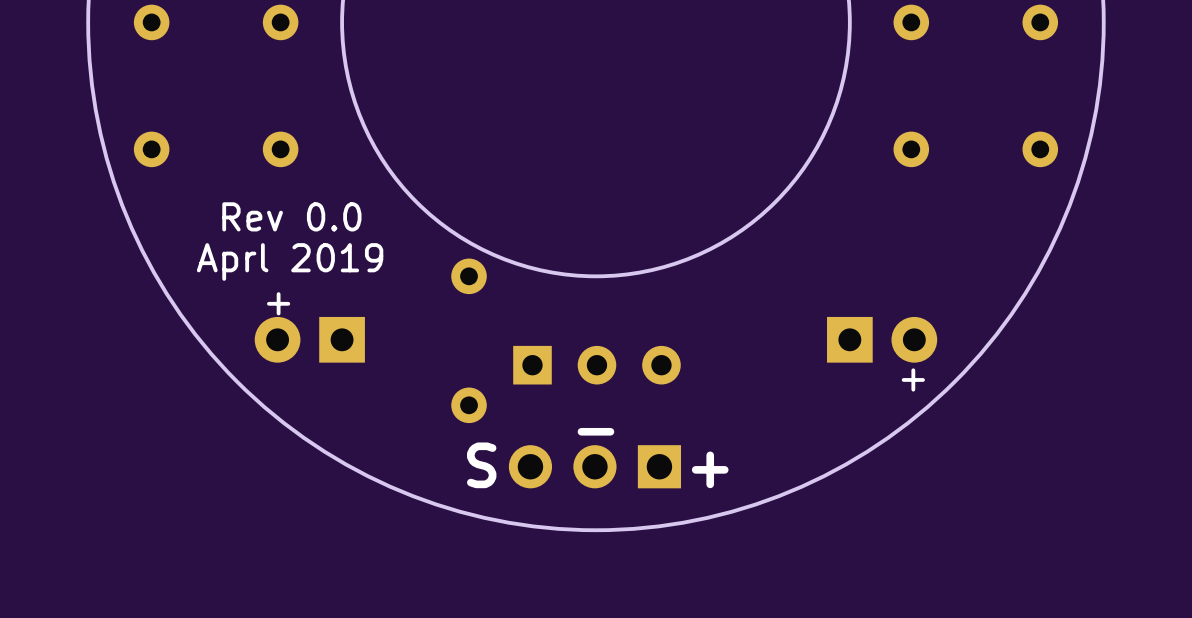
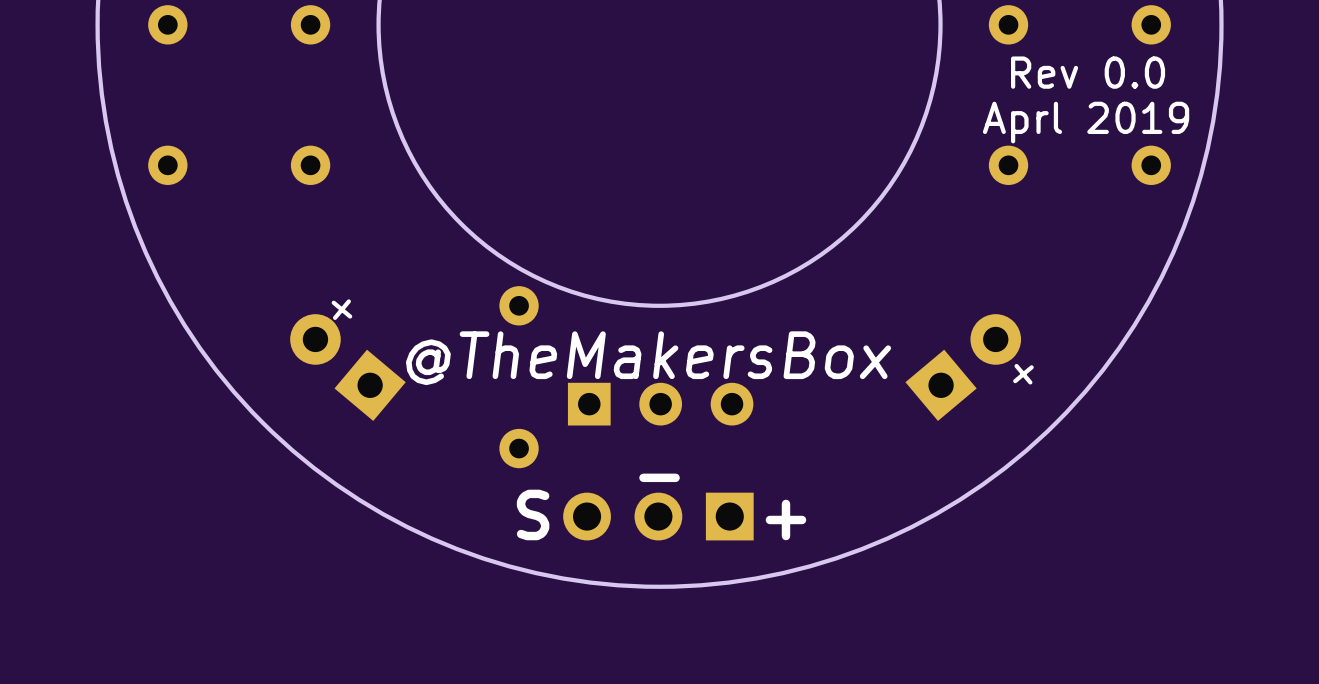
text: none -> Rev 0.0 (1088, 72)
text: none -> Aprl 2019 (1086, 122)
text: Rev 0.0 (291, 216) -> none
text: Aprl 2019 (290, 261) -> none
text: none -> @TheMakersBox (648, 358)
part rotation: 0° (309, 339) -> 40° clockwise (347, 367)
part rotation: 0° (882, 339) -> 40° counterclockwise (963, 367)

